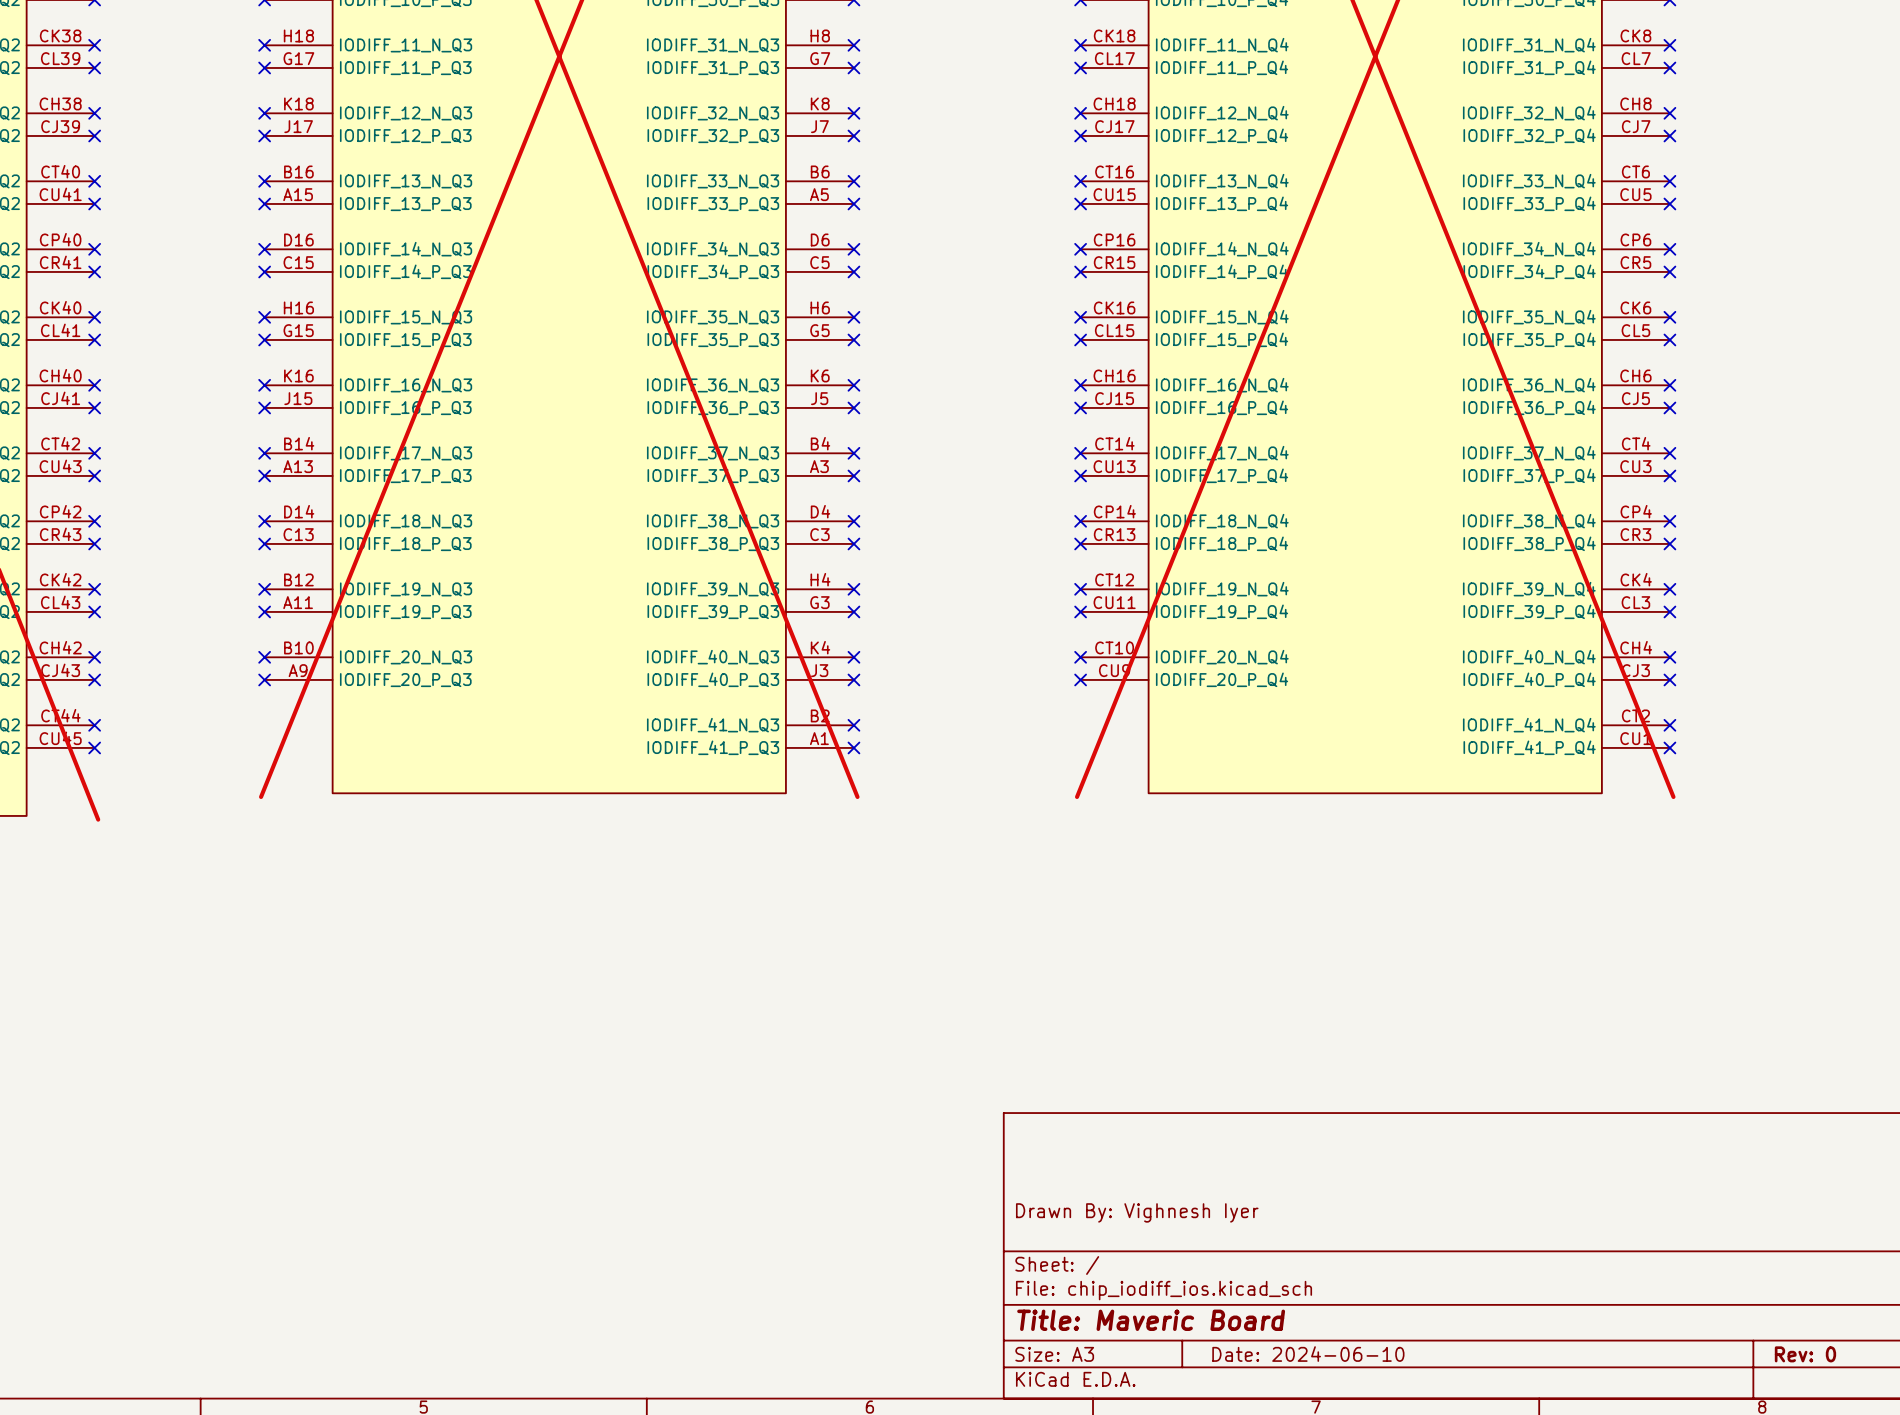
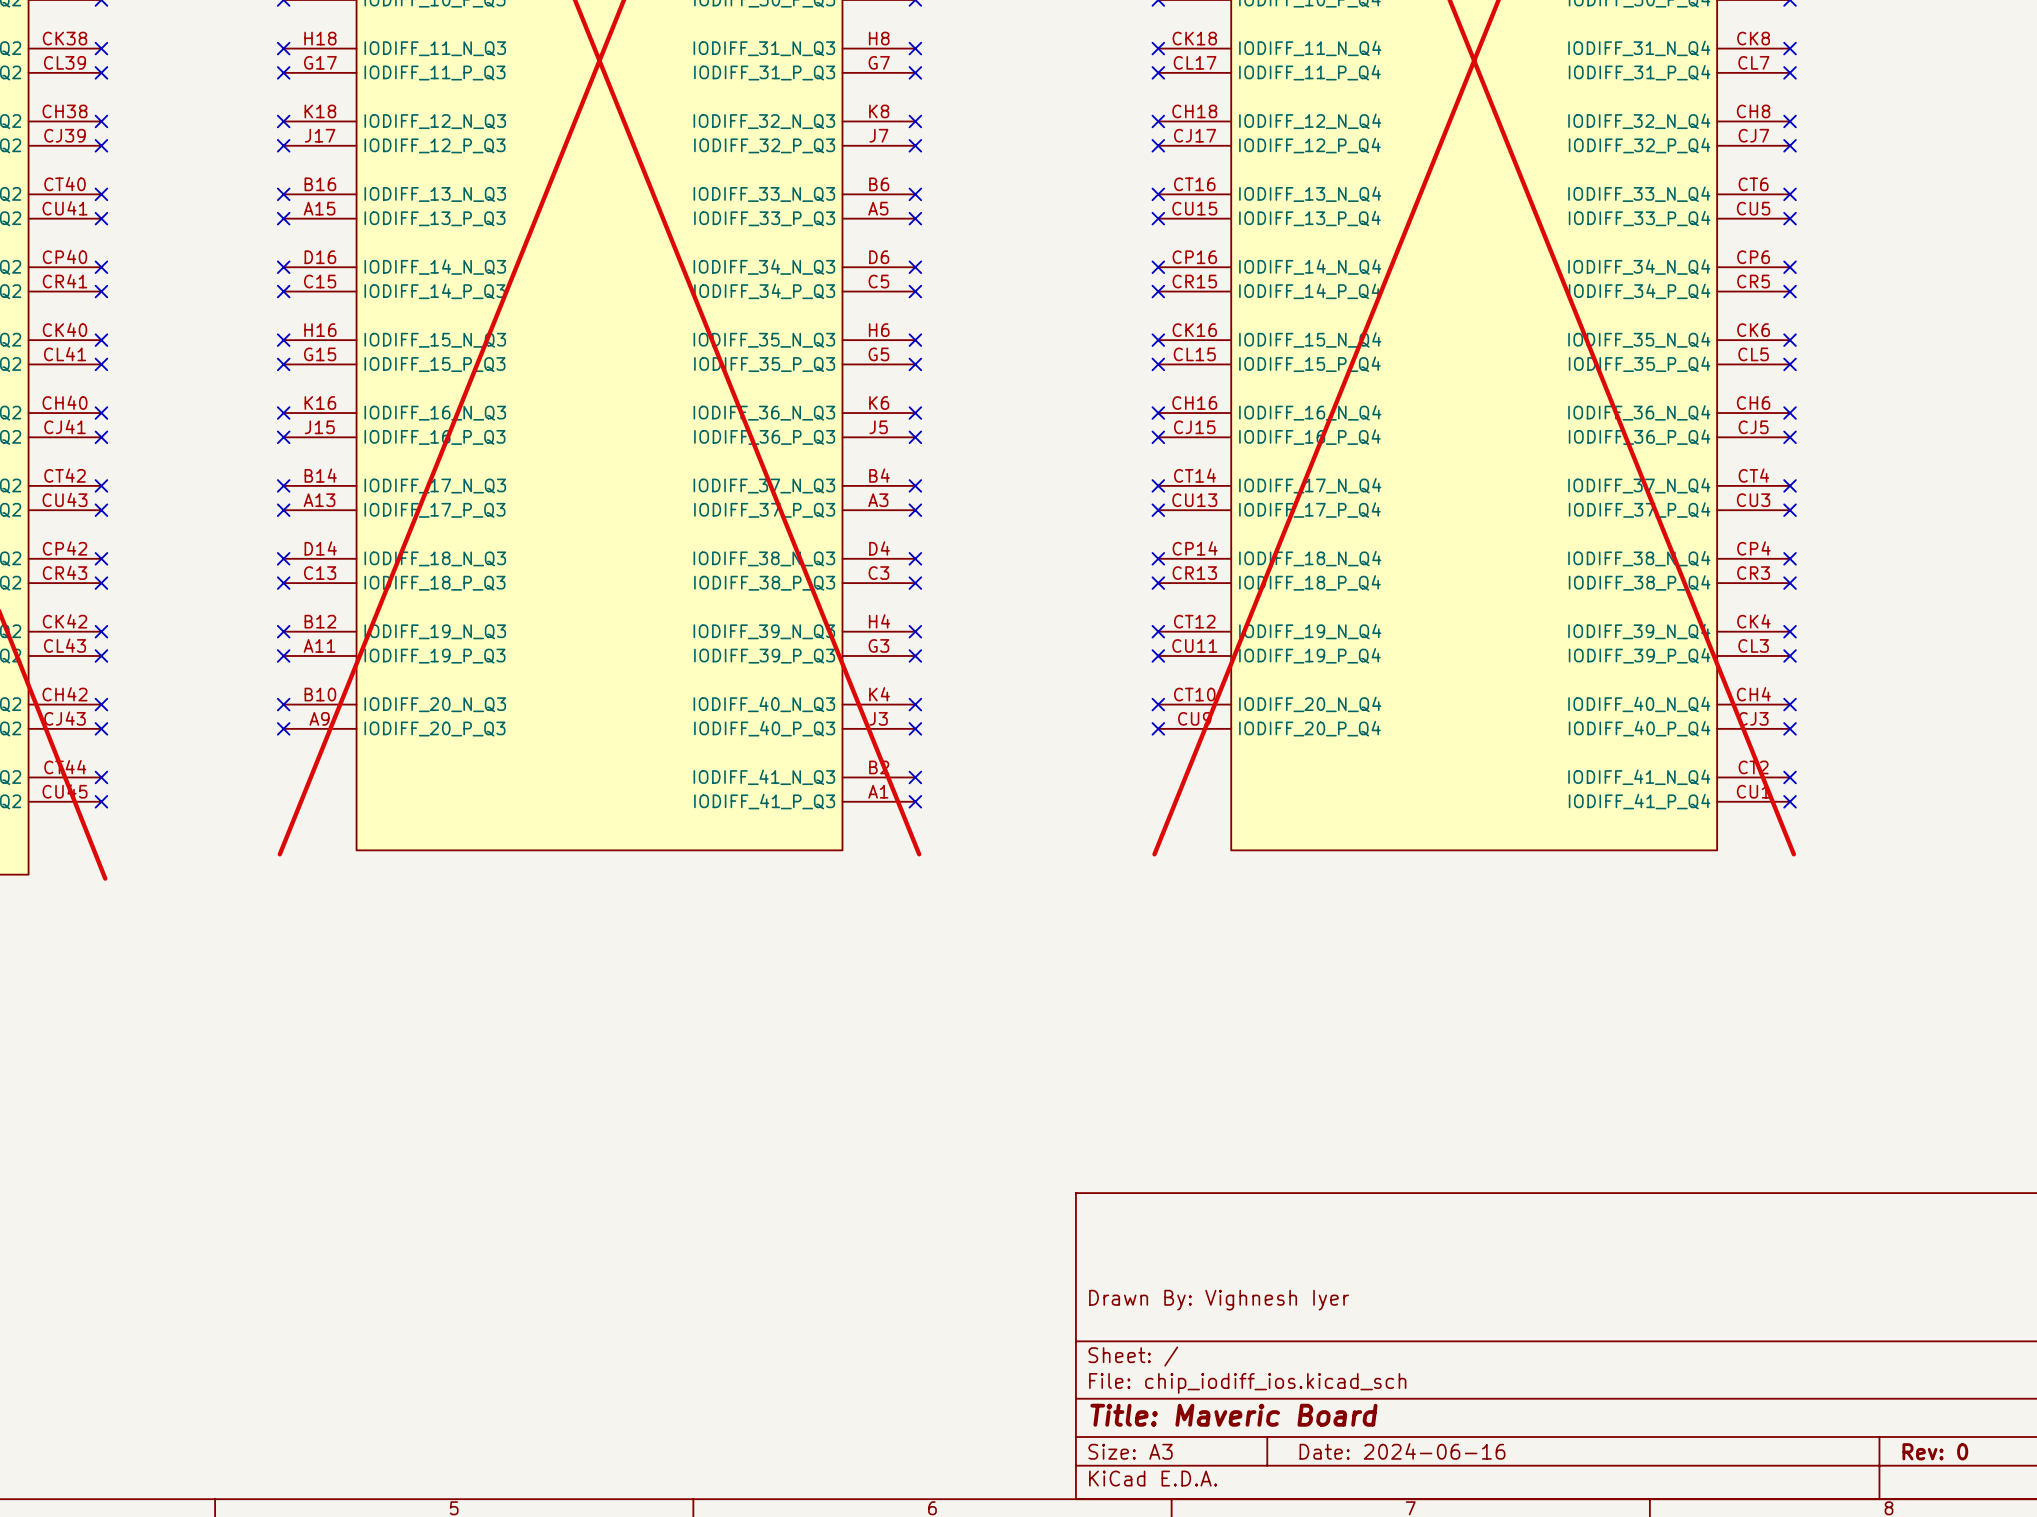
title block: Date: 2024-06-10 (1308, 1354) -> Date: 2024-06-16 (1402, 1451)

